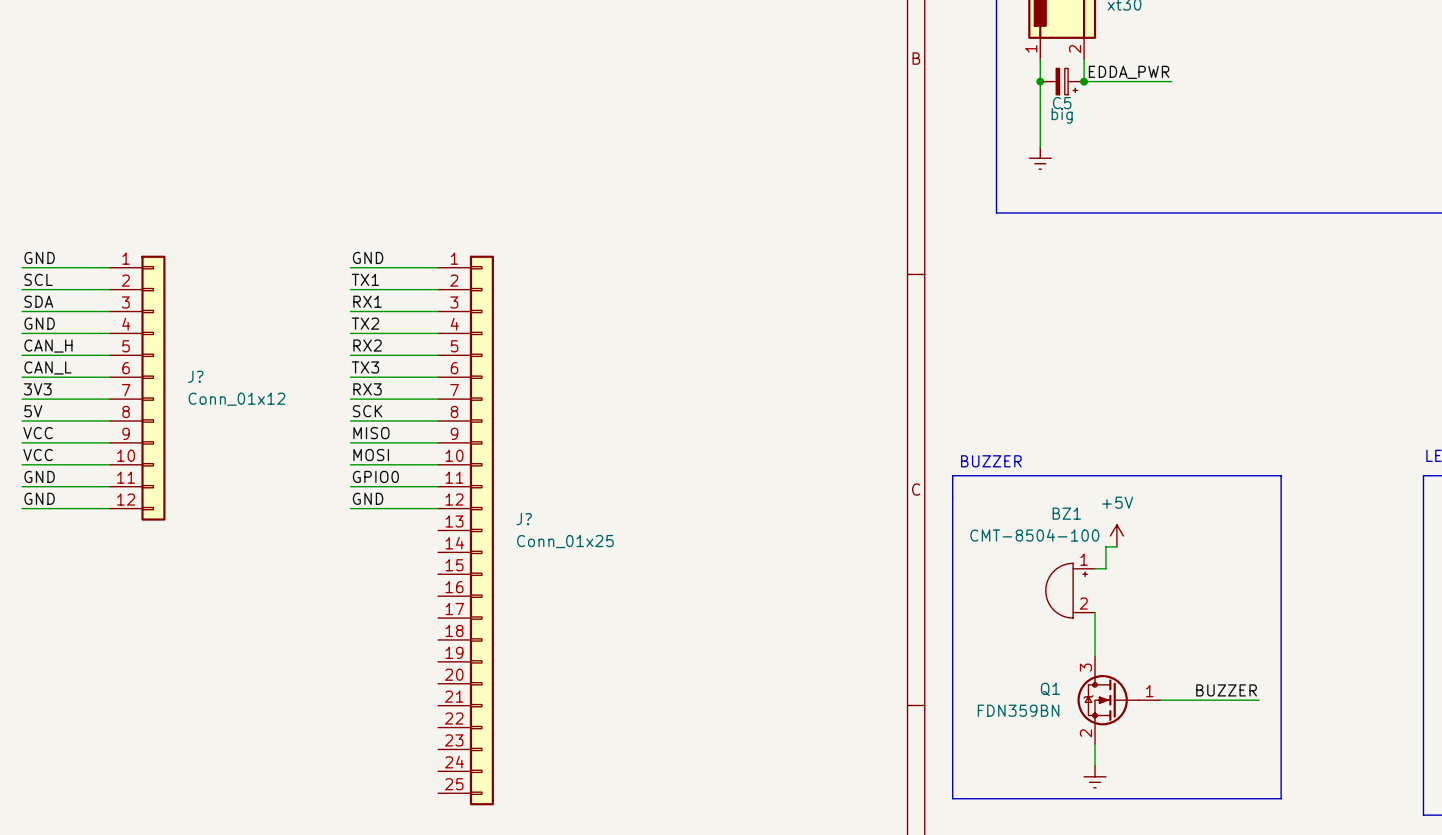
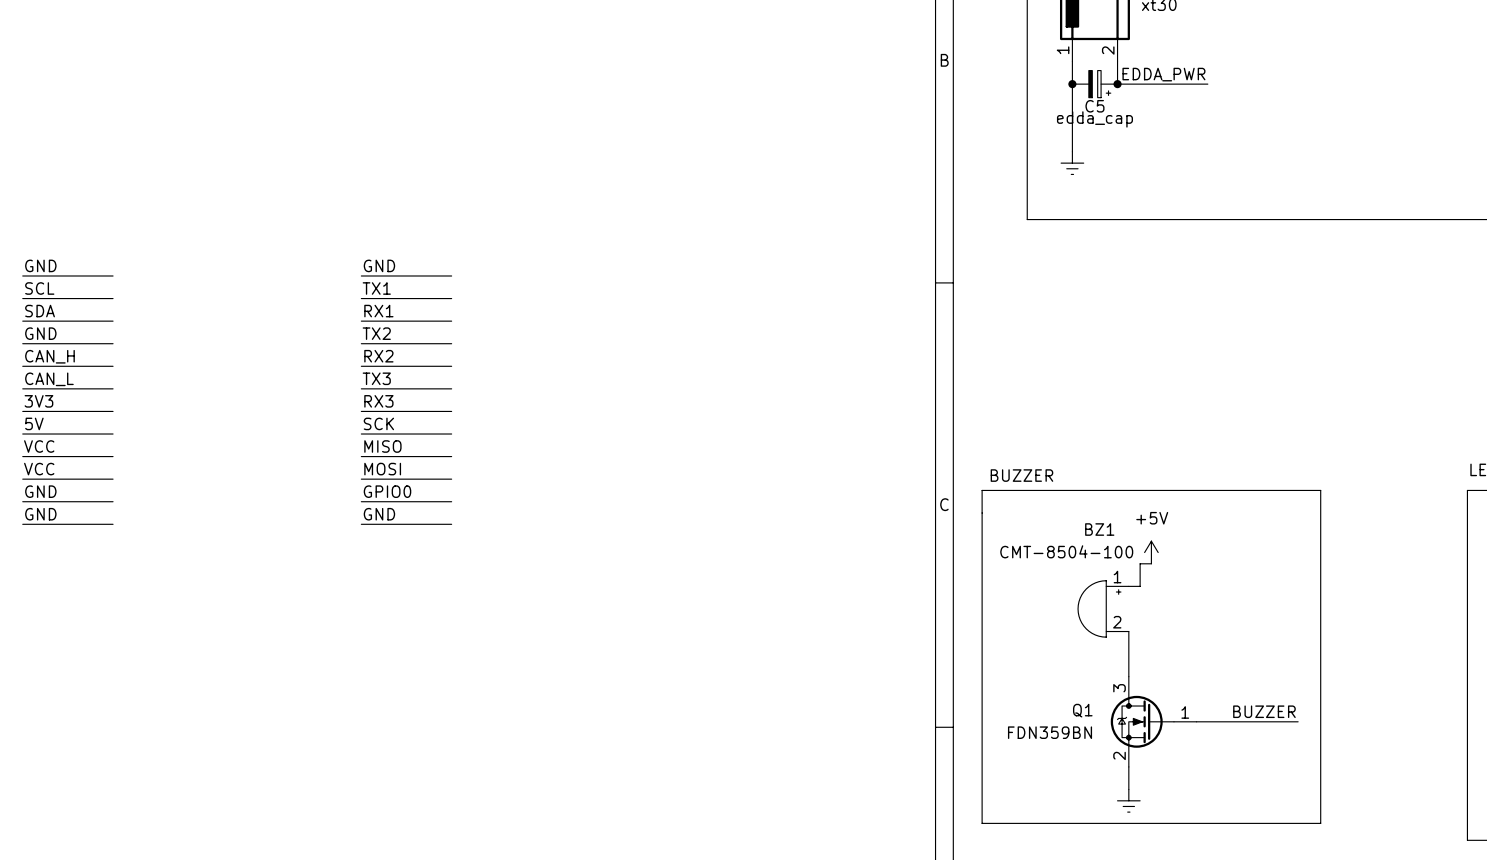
C5 value: big (1062, 115) -> edda_cap (1094, 119)
J?: Conn_01x12 (137, 388) -> none
J?: Conn_01x25 (466, 530) -> none

